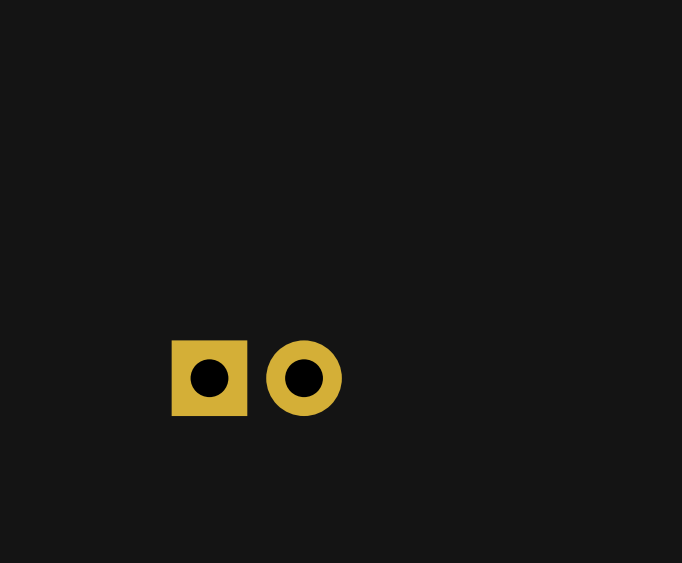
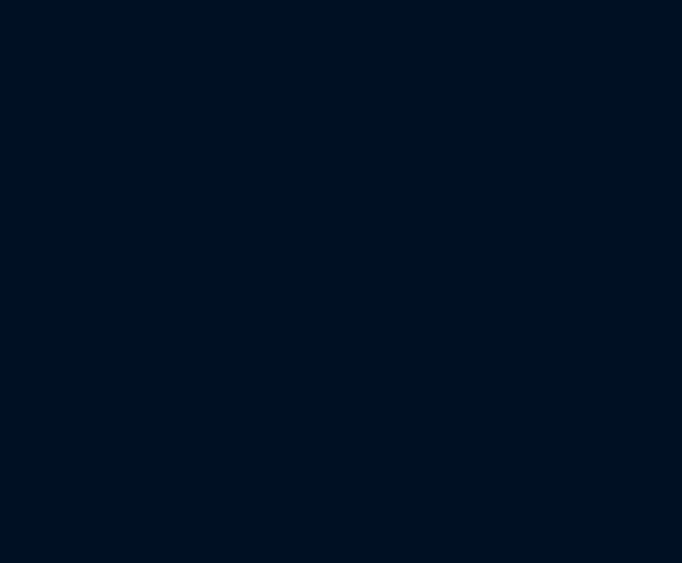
part: (256, 378) -> none

